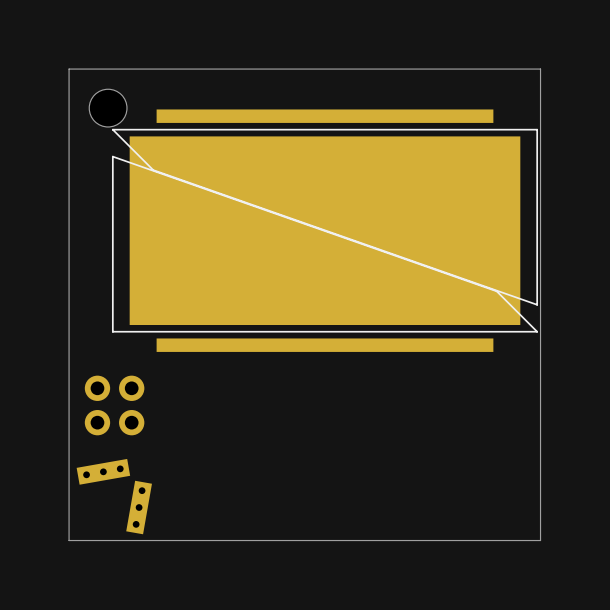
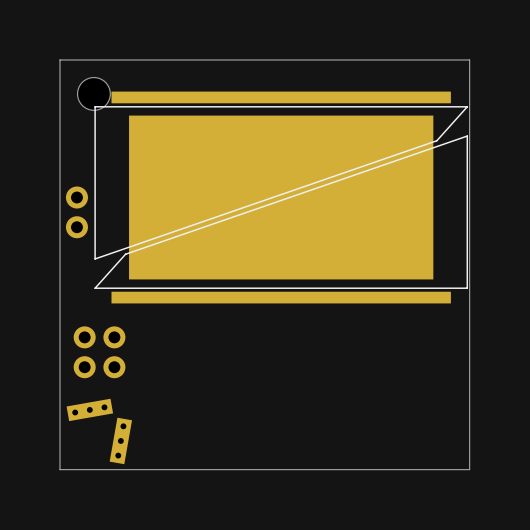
part footprint: [111, 109, 539, 352] -> [94, 91, 469, 304]
part: none -> (76, 212)

